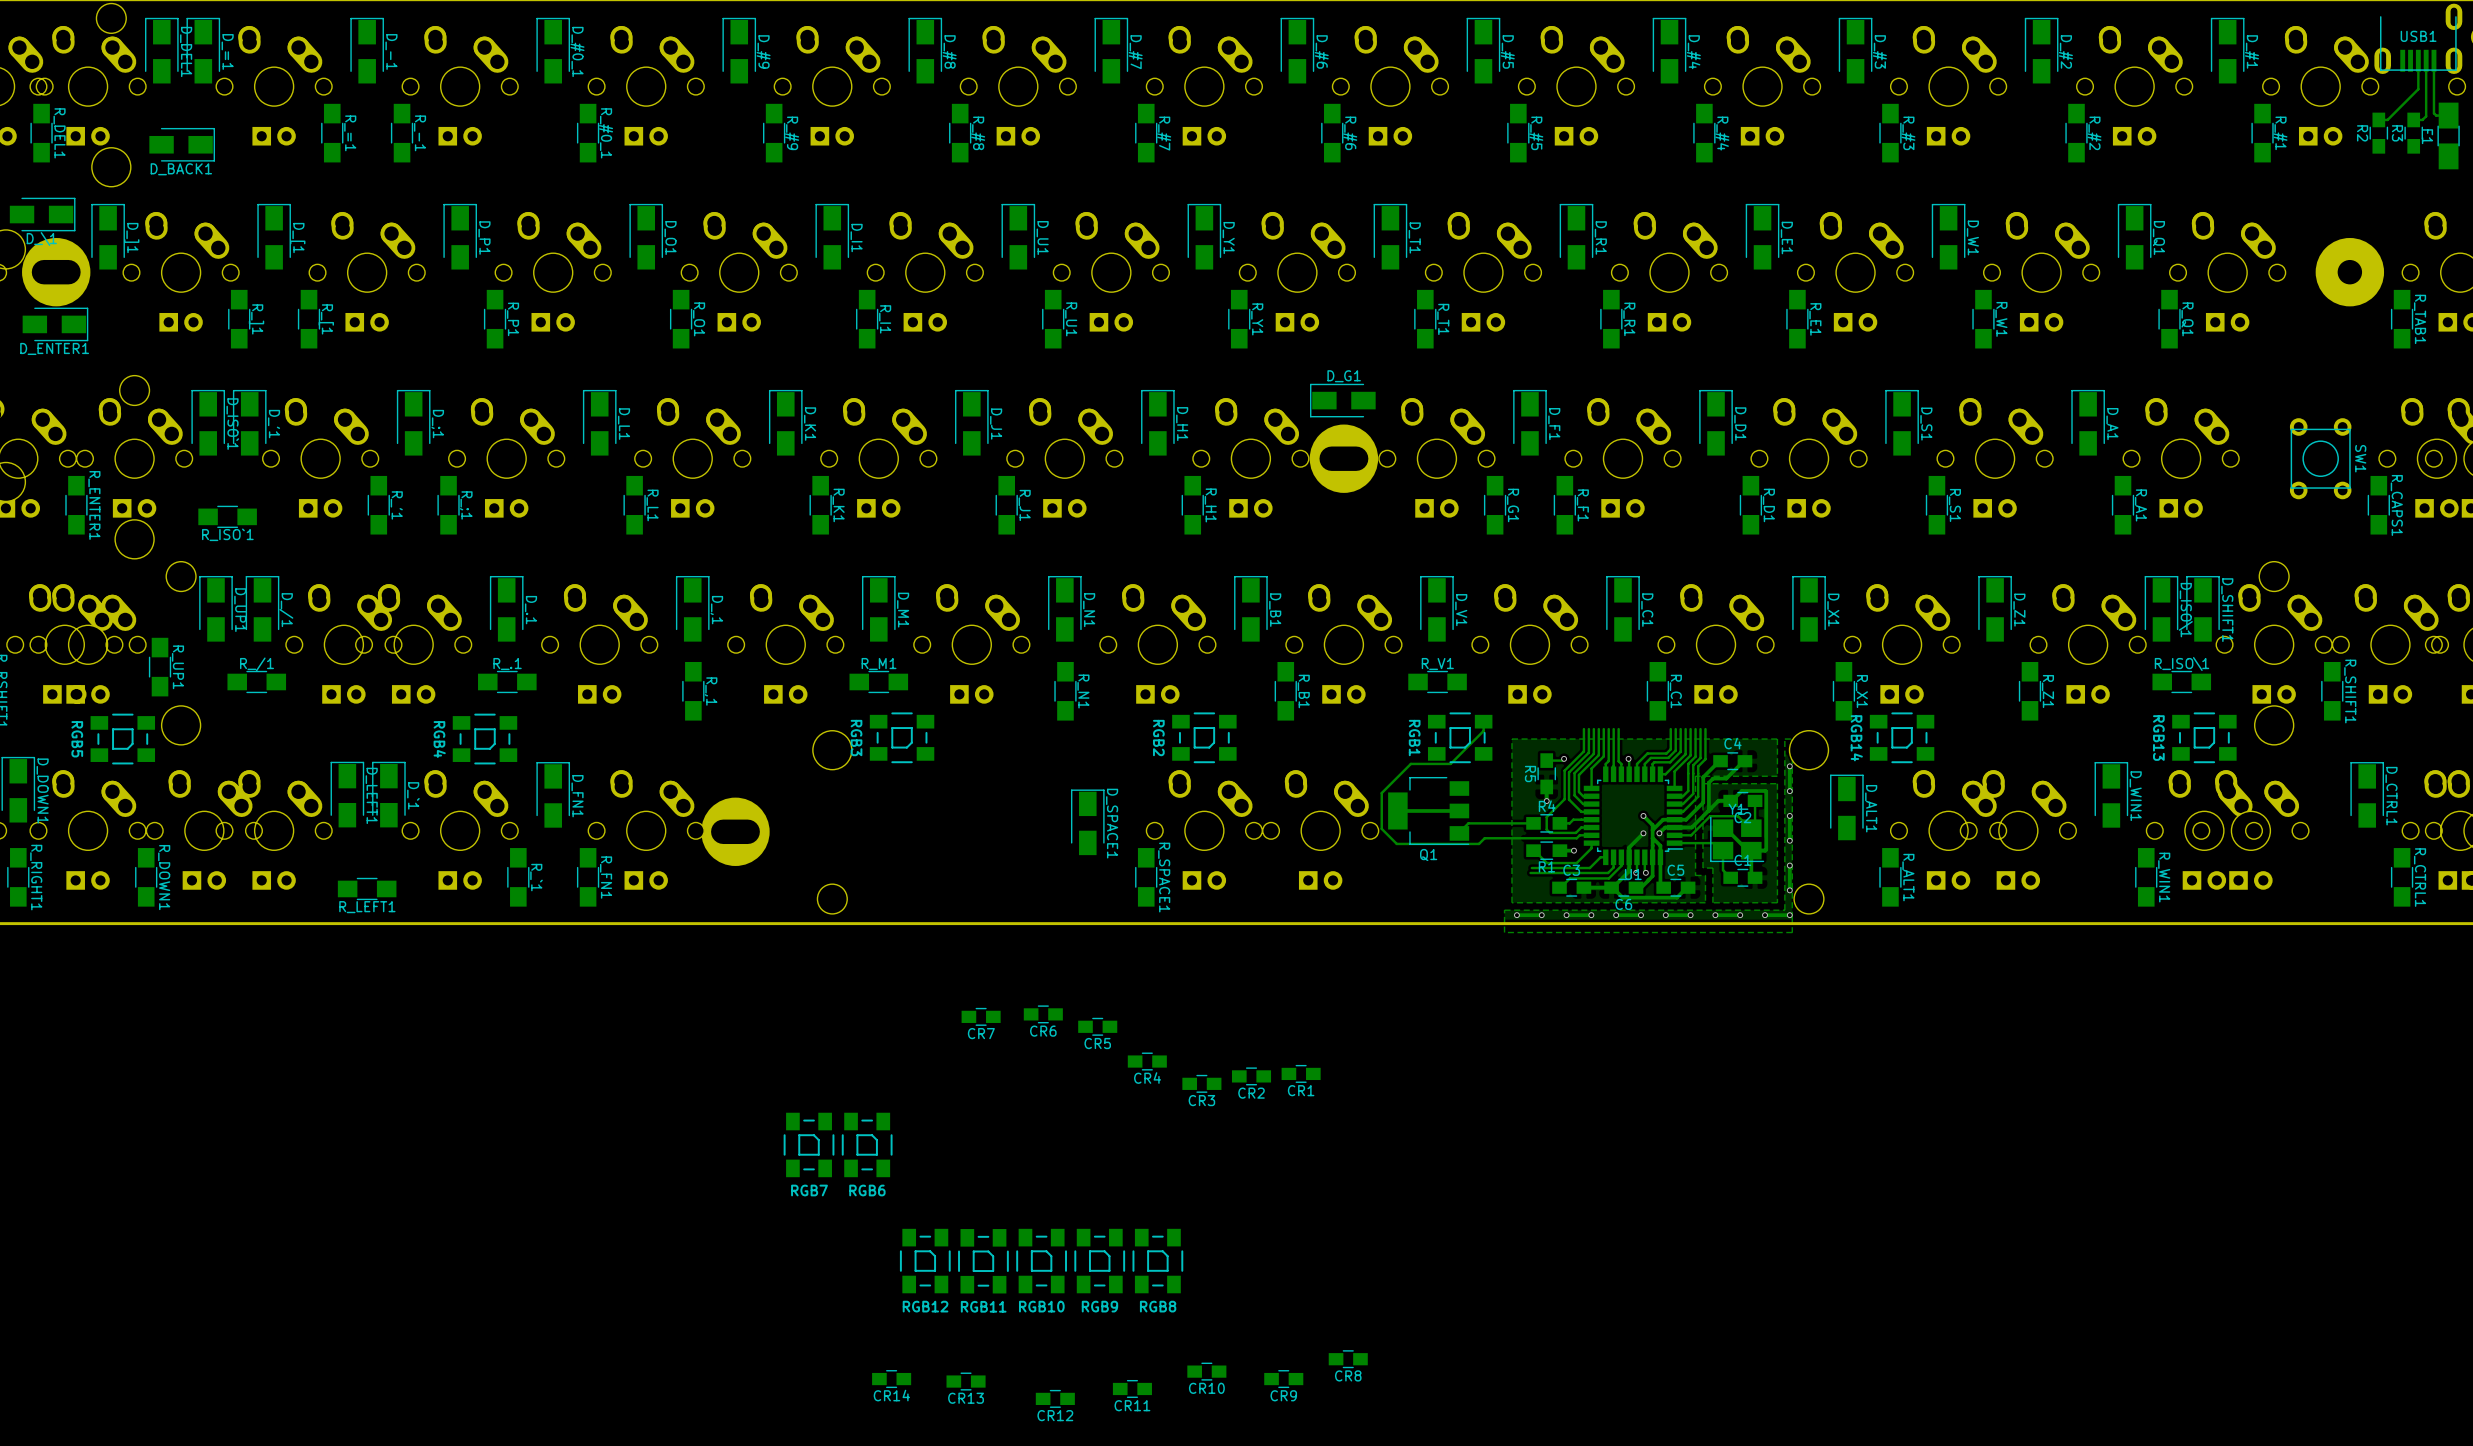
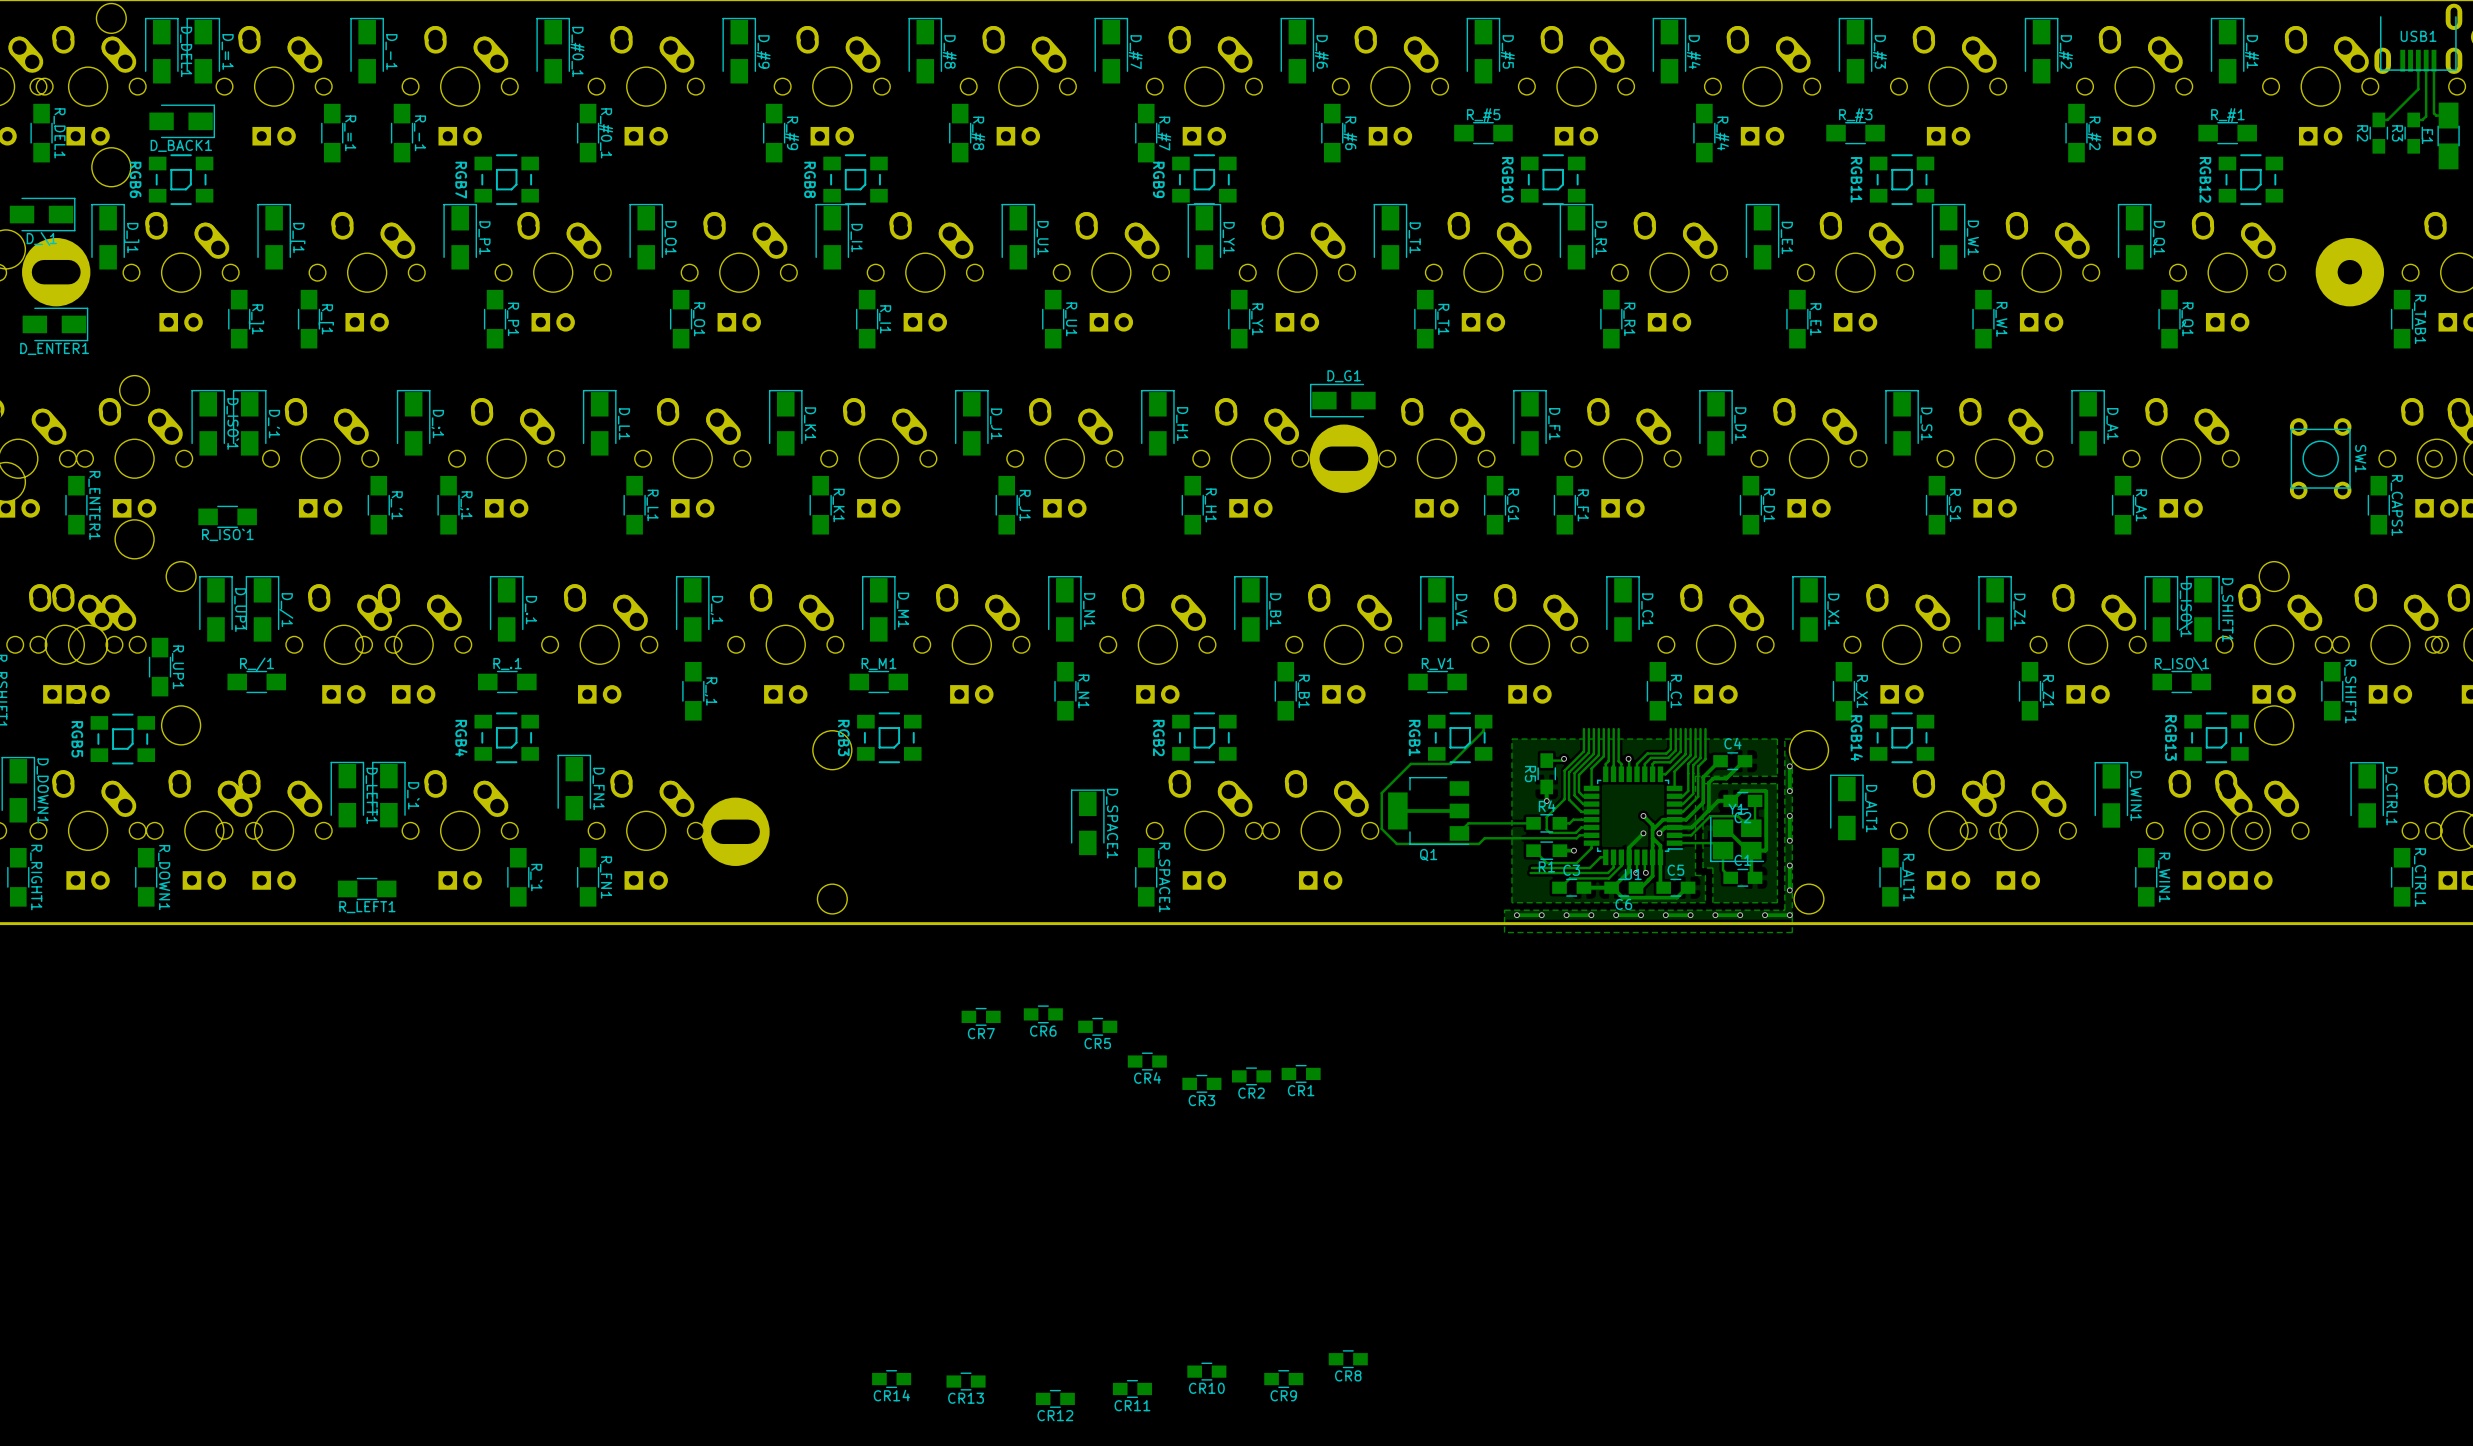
R_#5 rotation: 0° (1518, 133) -> 90° clockwise (1483, 133)
R_#5 name position: R_#5 (1536, 133) -> R_#5 (1483, 115)
R_#3 rotation: 0° (1890, 133) -> 90° clockwise (1855, 133)
R_#3 name position: R_#3 (1908, 133) -> R_#3 (1855, 115)
R_#1 rotation: 0° (2262, 133) -> 90° clockwise (2227, 133)
R_#1 name position: R_#1 (2280, 133) -> R_#1 (2227, 115)
D_BACK1 position: (182, 144) -> (182, 121)
RGB3 position: (902, 737) -> (889, 737)
RGB13 position: (2204, 737) -> (2216, 737)
RGB4 position: (484, 739) -> (506, 737)
D_FN1 position: (553, 794) -> (574, 787)
RGB7 rotation: 0° (809, 1144) -> 90° clockwise (506, 179)
RGB7 position: (809, 1144) -> (506, 179)
RGB6 rotation: 0° (867, 1144) -> 90° clockwise (181, 179)
RGB6 position: (867, 1144) -> (181, 179)
RGB12 rotation: 0° (925, 1261) -> 90° clockwise (2250, 179)
RGB12 position: (925, 1261) -> (2250, 179)
RGB11 rotation: 0° (983, 1261) -> 90° clockwise (1902, 179)
RGB11 position: (983, 1261) -> (1902, 179)
RGB10 rotation: 0° (1041, 1261) -> 90° clockwise (1553, 179)
RGB10 position: (1041, 1261) -> (1553, 179)
RGB9 rotation: 0° (1099, 1261) -> 90° clockwise (1204, 179)
RGB9 position: (1099, 1261) -> (1204, 179)
RGB8 rotation: 0° (1157, 1261) -> 90° clockwise (855, 179)
RGB8 position: (1157, 1261) -> (855, 179)

